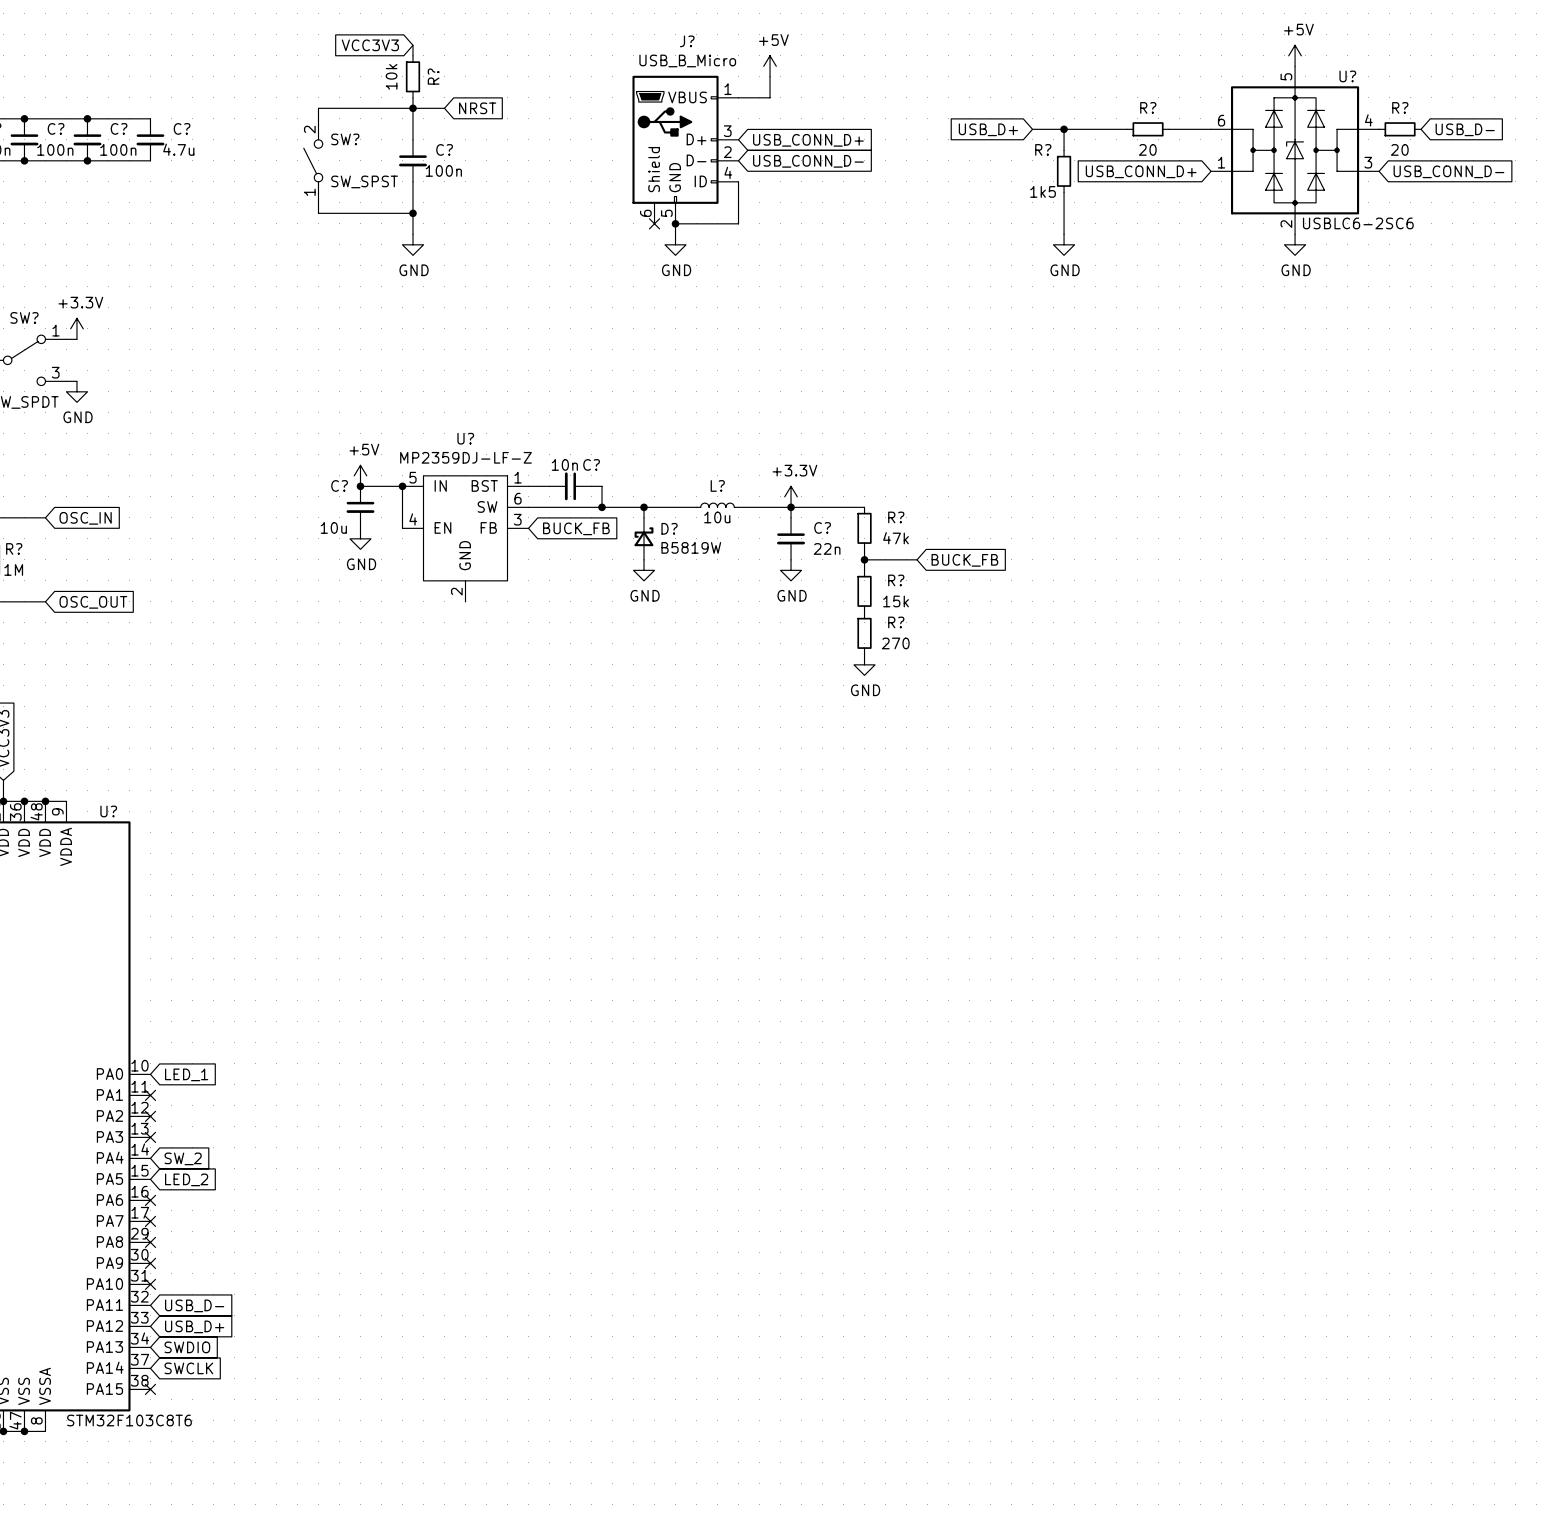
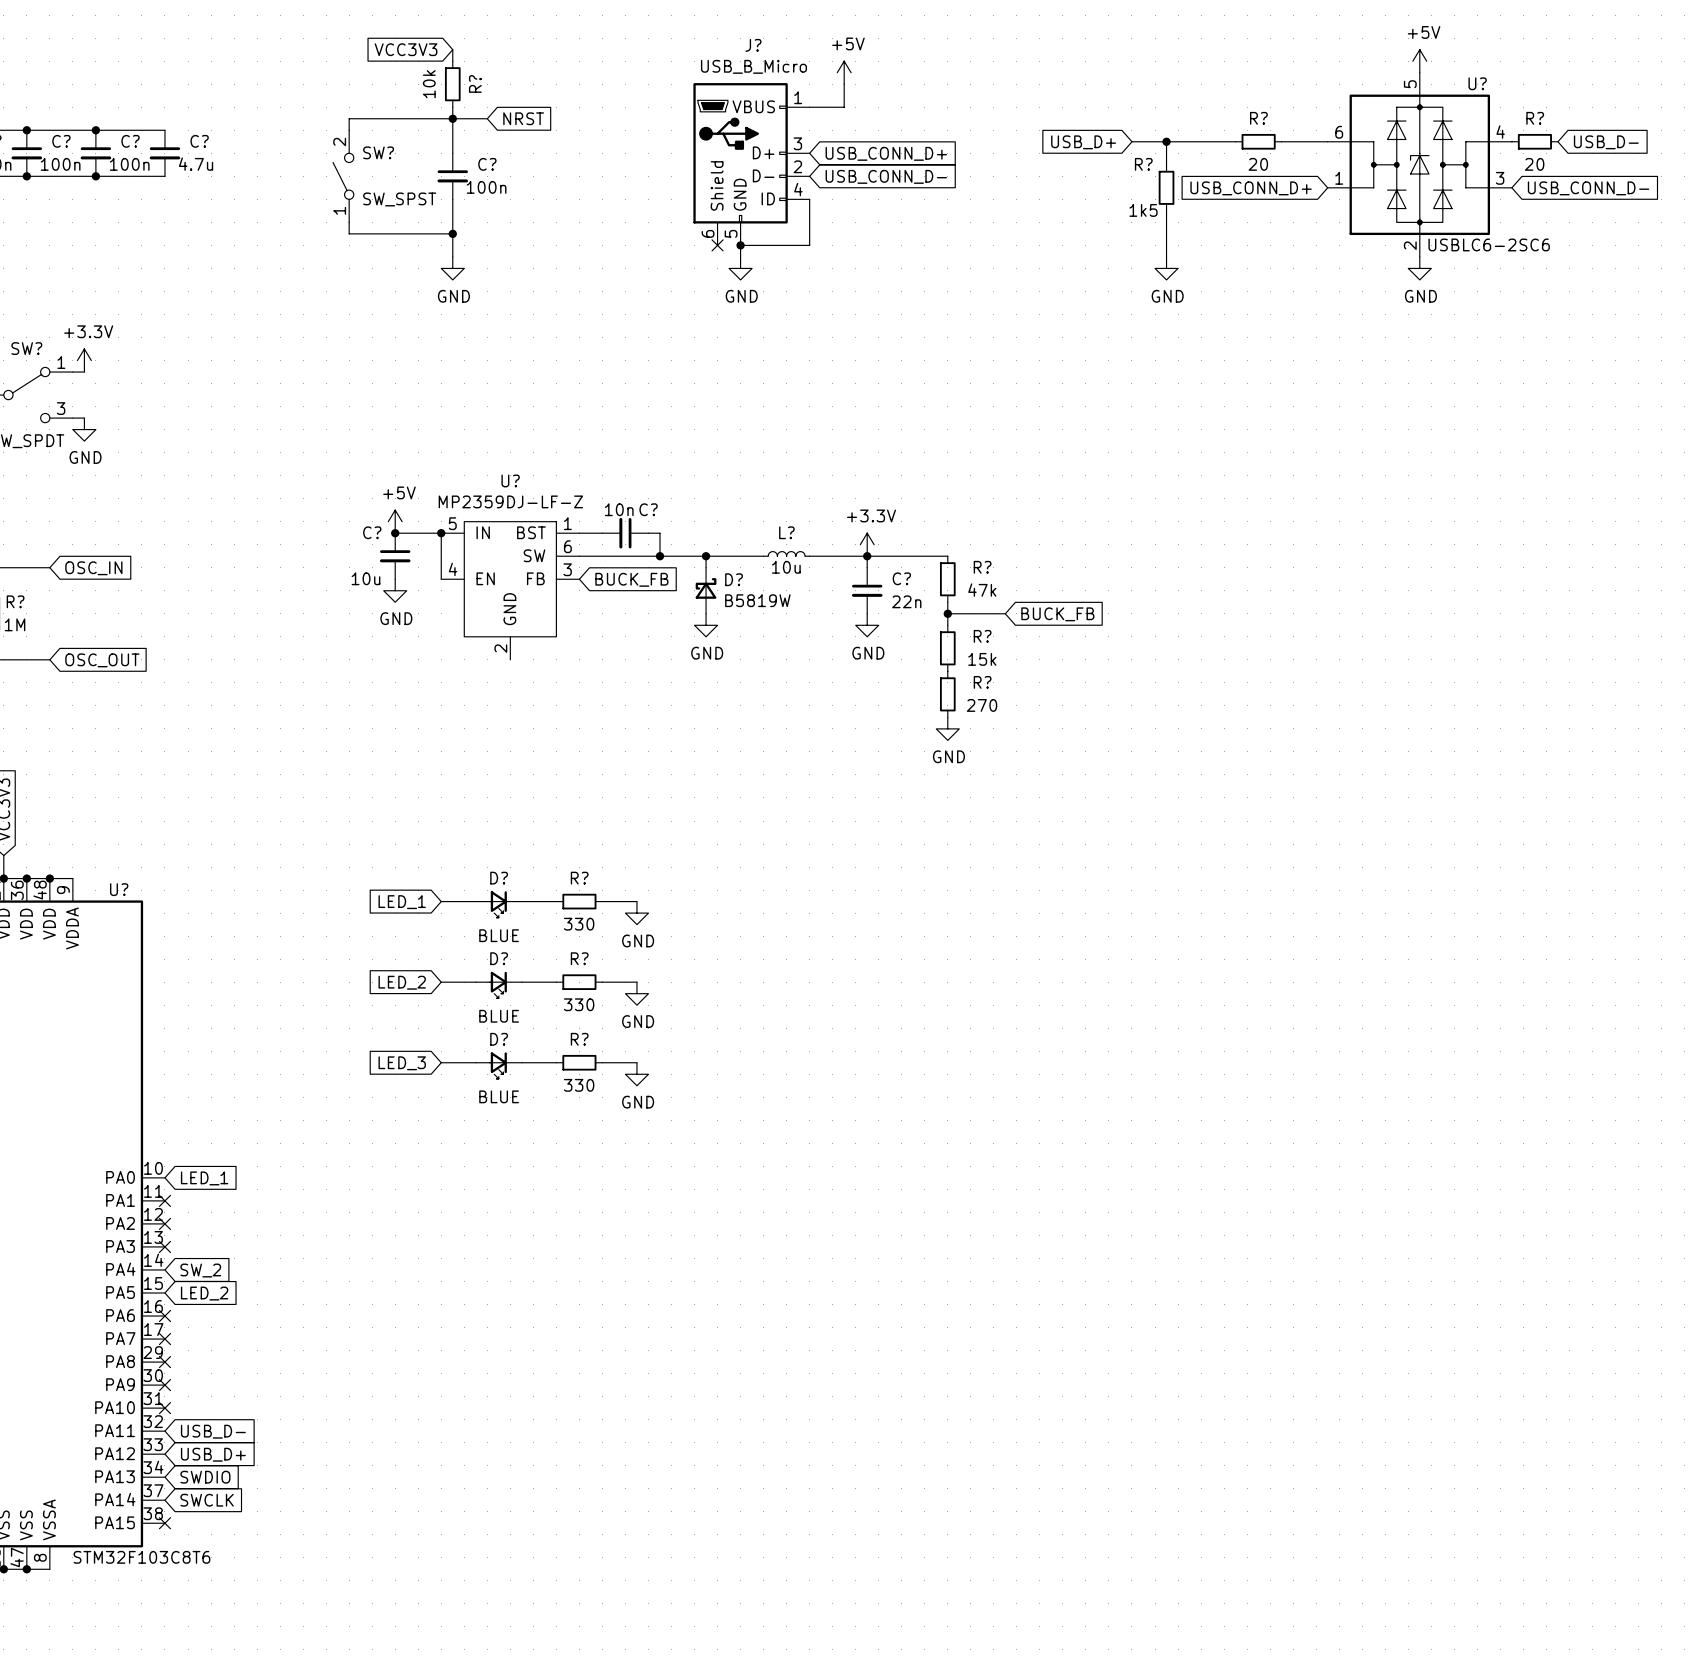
global label: none -> LED_1 (402, 902)
wire: none -> (441, 901) (475, 901)
wire: none -> (521, 901) (556, 901)
R?: none -> 330 (579, 901)
wire: none -> (602, 901) (636, 901)
D?: none -> BLUE (498, 904)
power symbol: none -> GND (636, 913)
wire: none -> (441, 982) (475, 982)
wire: none -> (521, 982) (556, 982)
R?: none -> 330 (579, 982)
wire: none -> (602, 982) (636, 982)
global label: none -> LED_2 (402, 982)
D?: none -> BLUE (498, 985)
power symbol: none -> GND (636, 993)
global label: none -> LED_3 (402, 1063)
wire: none -> (441, 1062) (475, 1062)
wire: none -> (521, 1062) (556, 1062)
R?: none -> 330 (579, 1062)
wire: none -> (602, 1062) (636, 1062)
D?: none -> BLUE (498, 1065)
power symbol: none -> GND (636, 1074)

